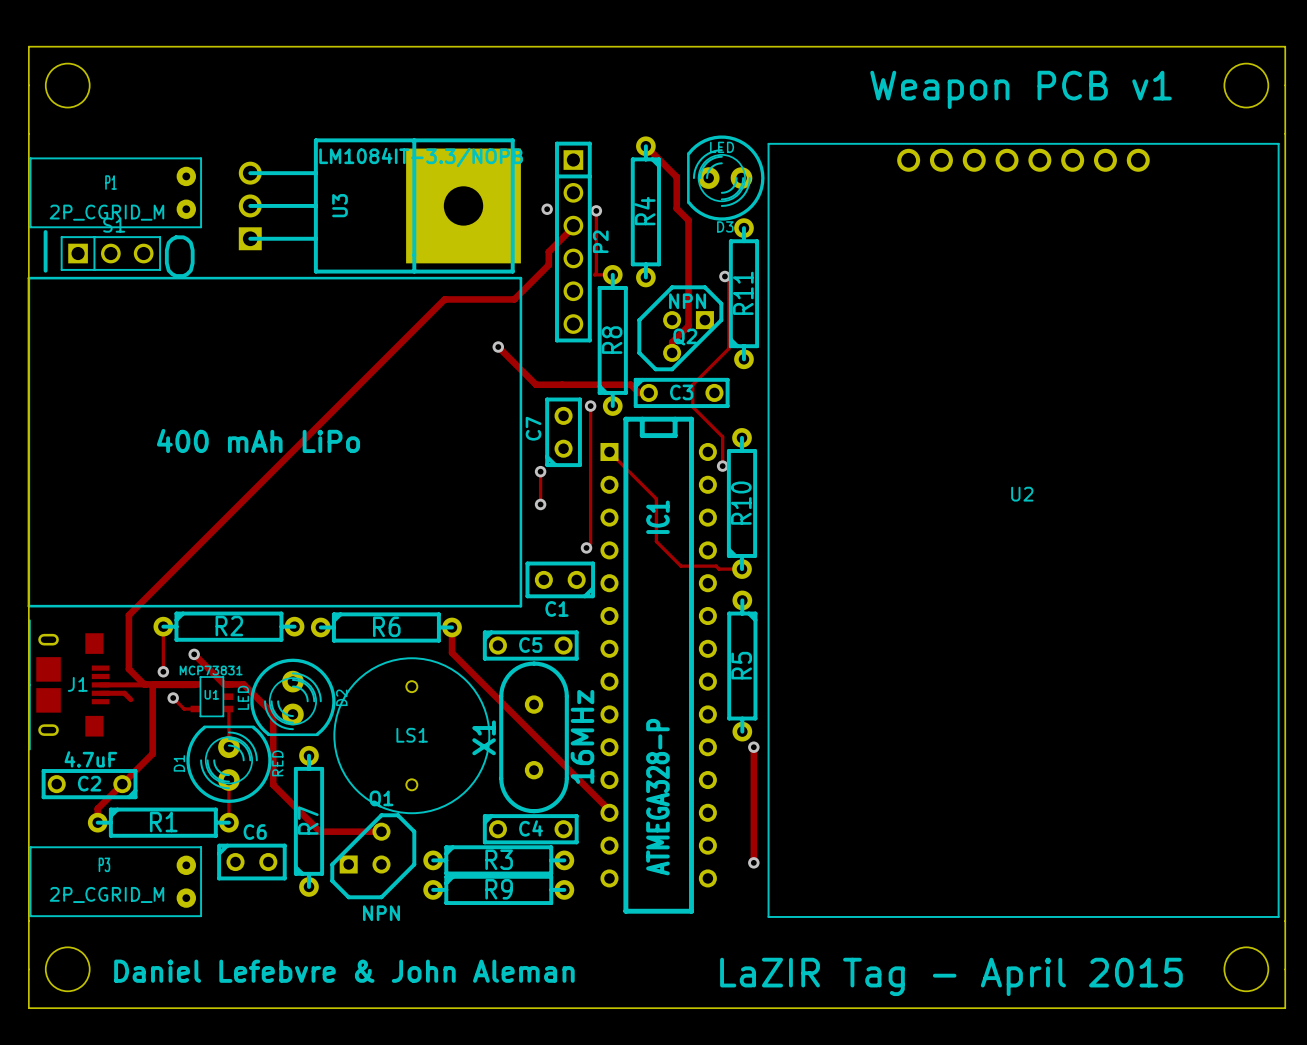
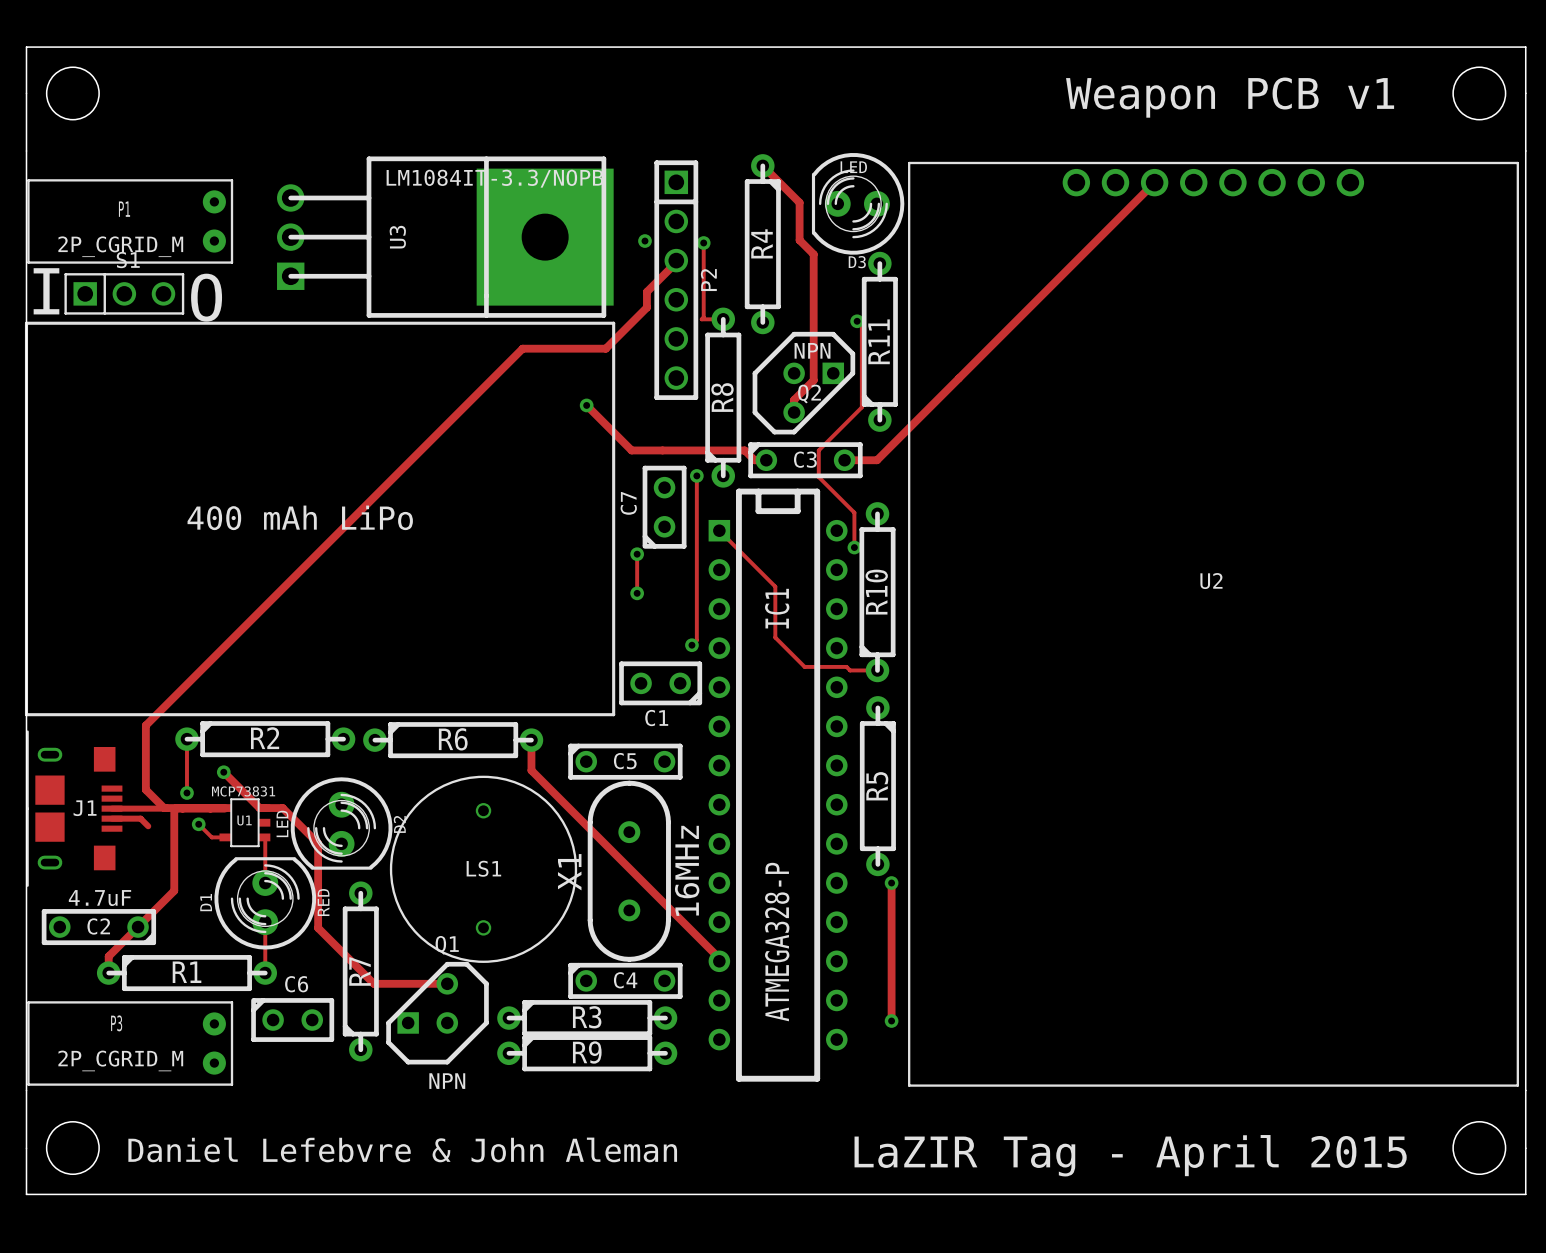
track: none -> (844, 460) (877, 460)
track: none -> (877, 460) (1154, 182) (877, 460)

